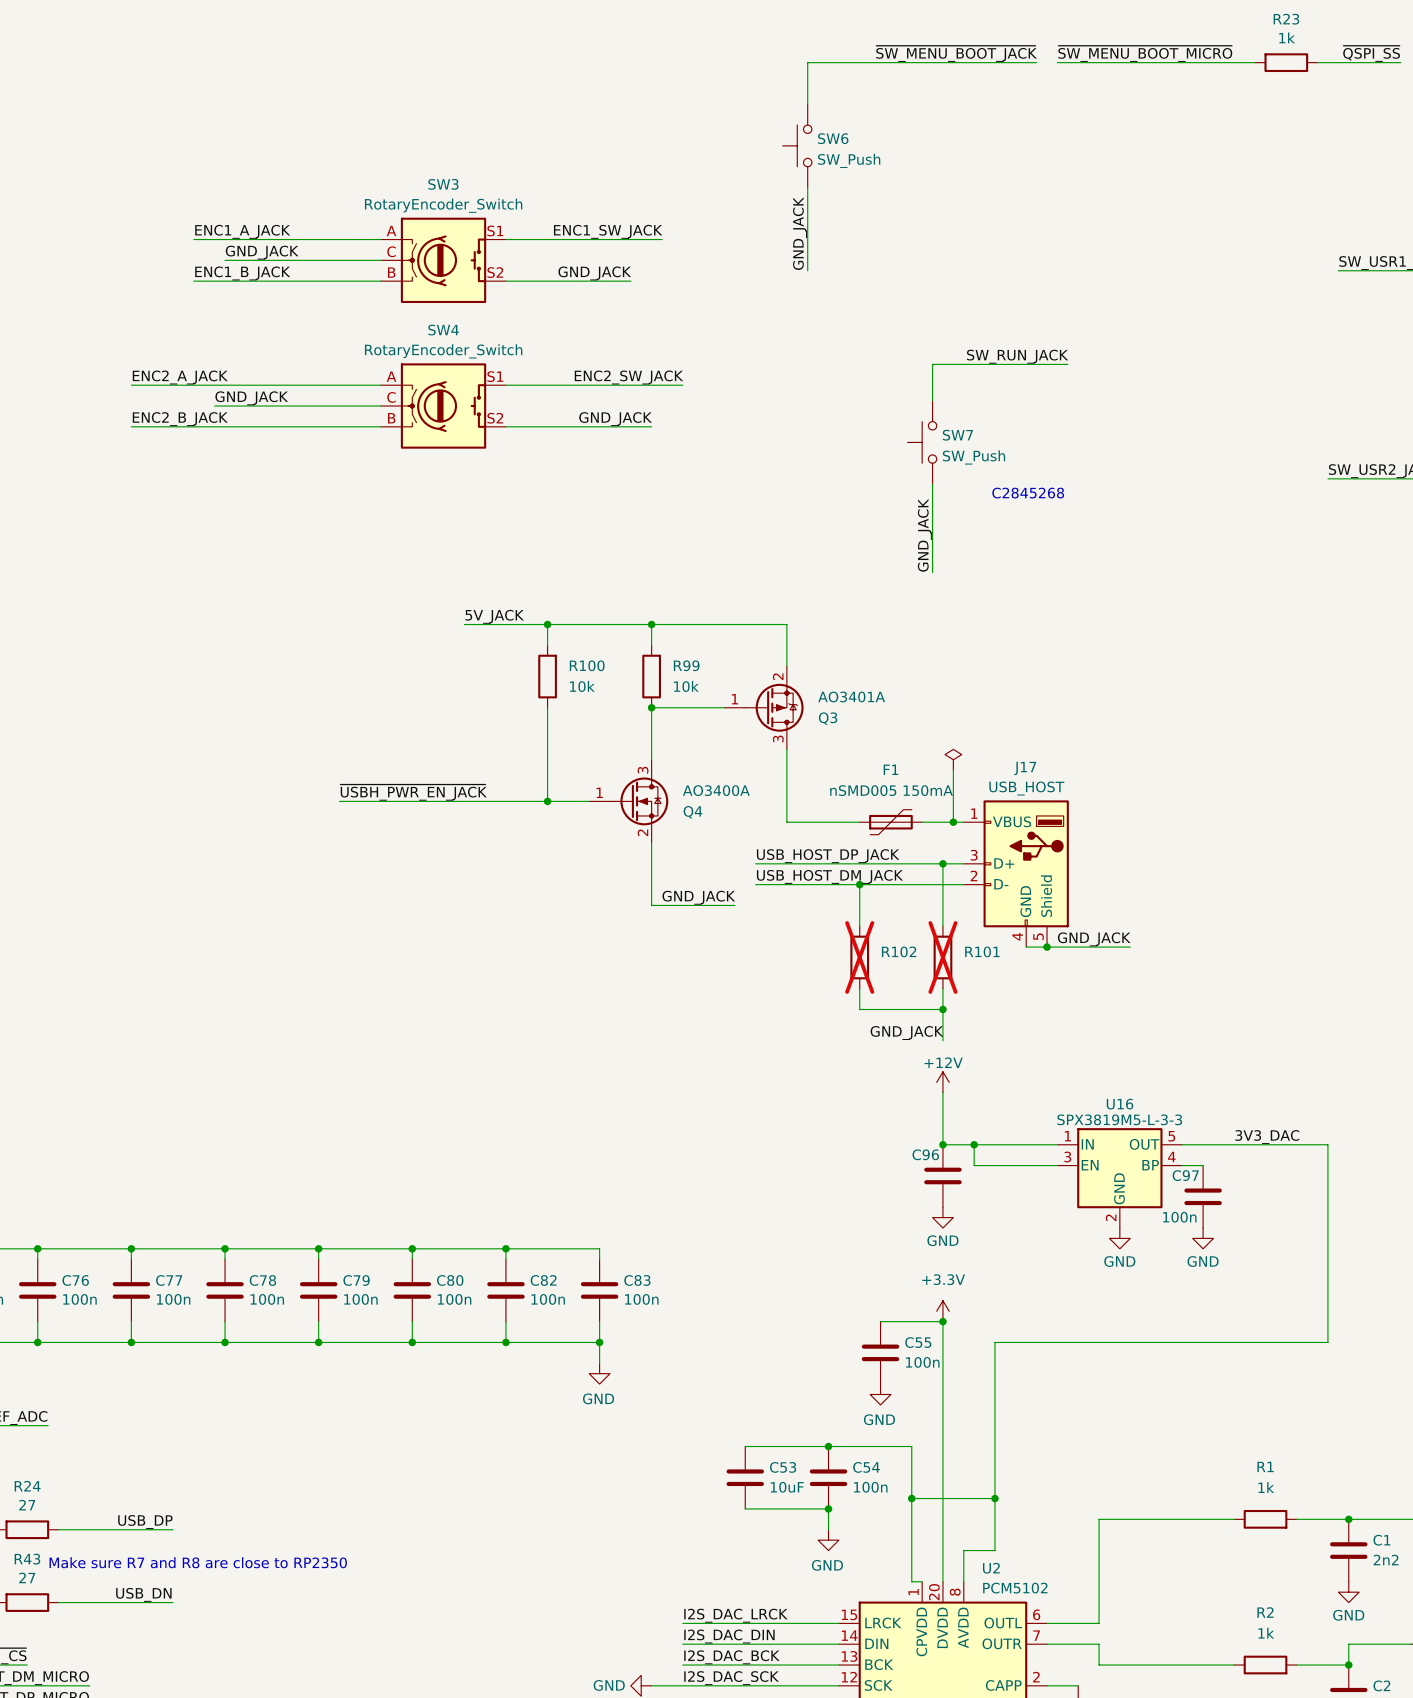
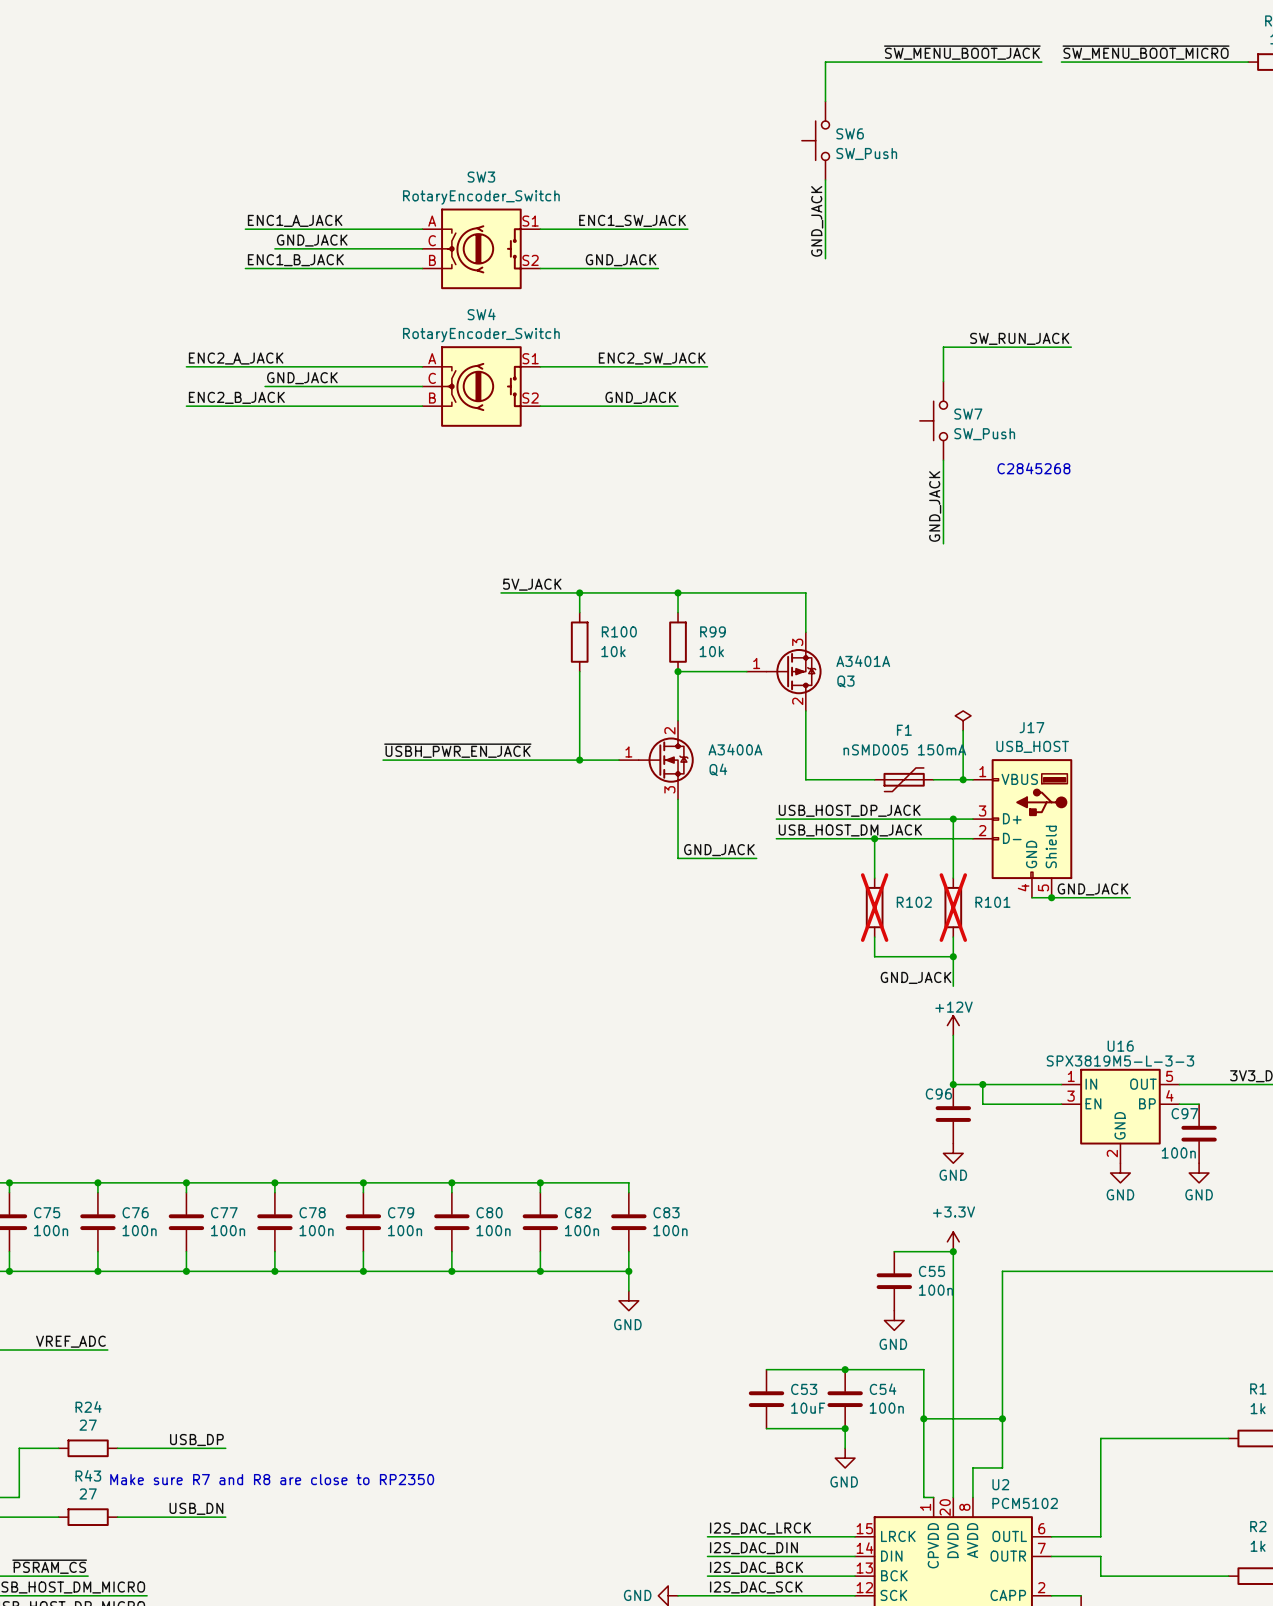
Q3 pin number: 2 (778, 676) -> 3 (797, 642)
Q3 value: AO3401A (851, 696) -> A3401A (863, 661)
Q3 pin number: 3 (778, 739) -> 2 (797, 701)
Q4 symbol: [589, 759, 669, 844] -> [619, 720, 694, 800]
Q4 value: AO3400A (716, 790) -> A3400A (735, 749)

